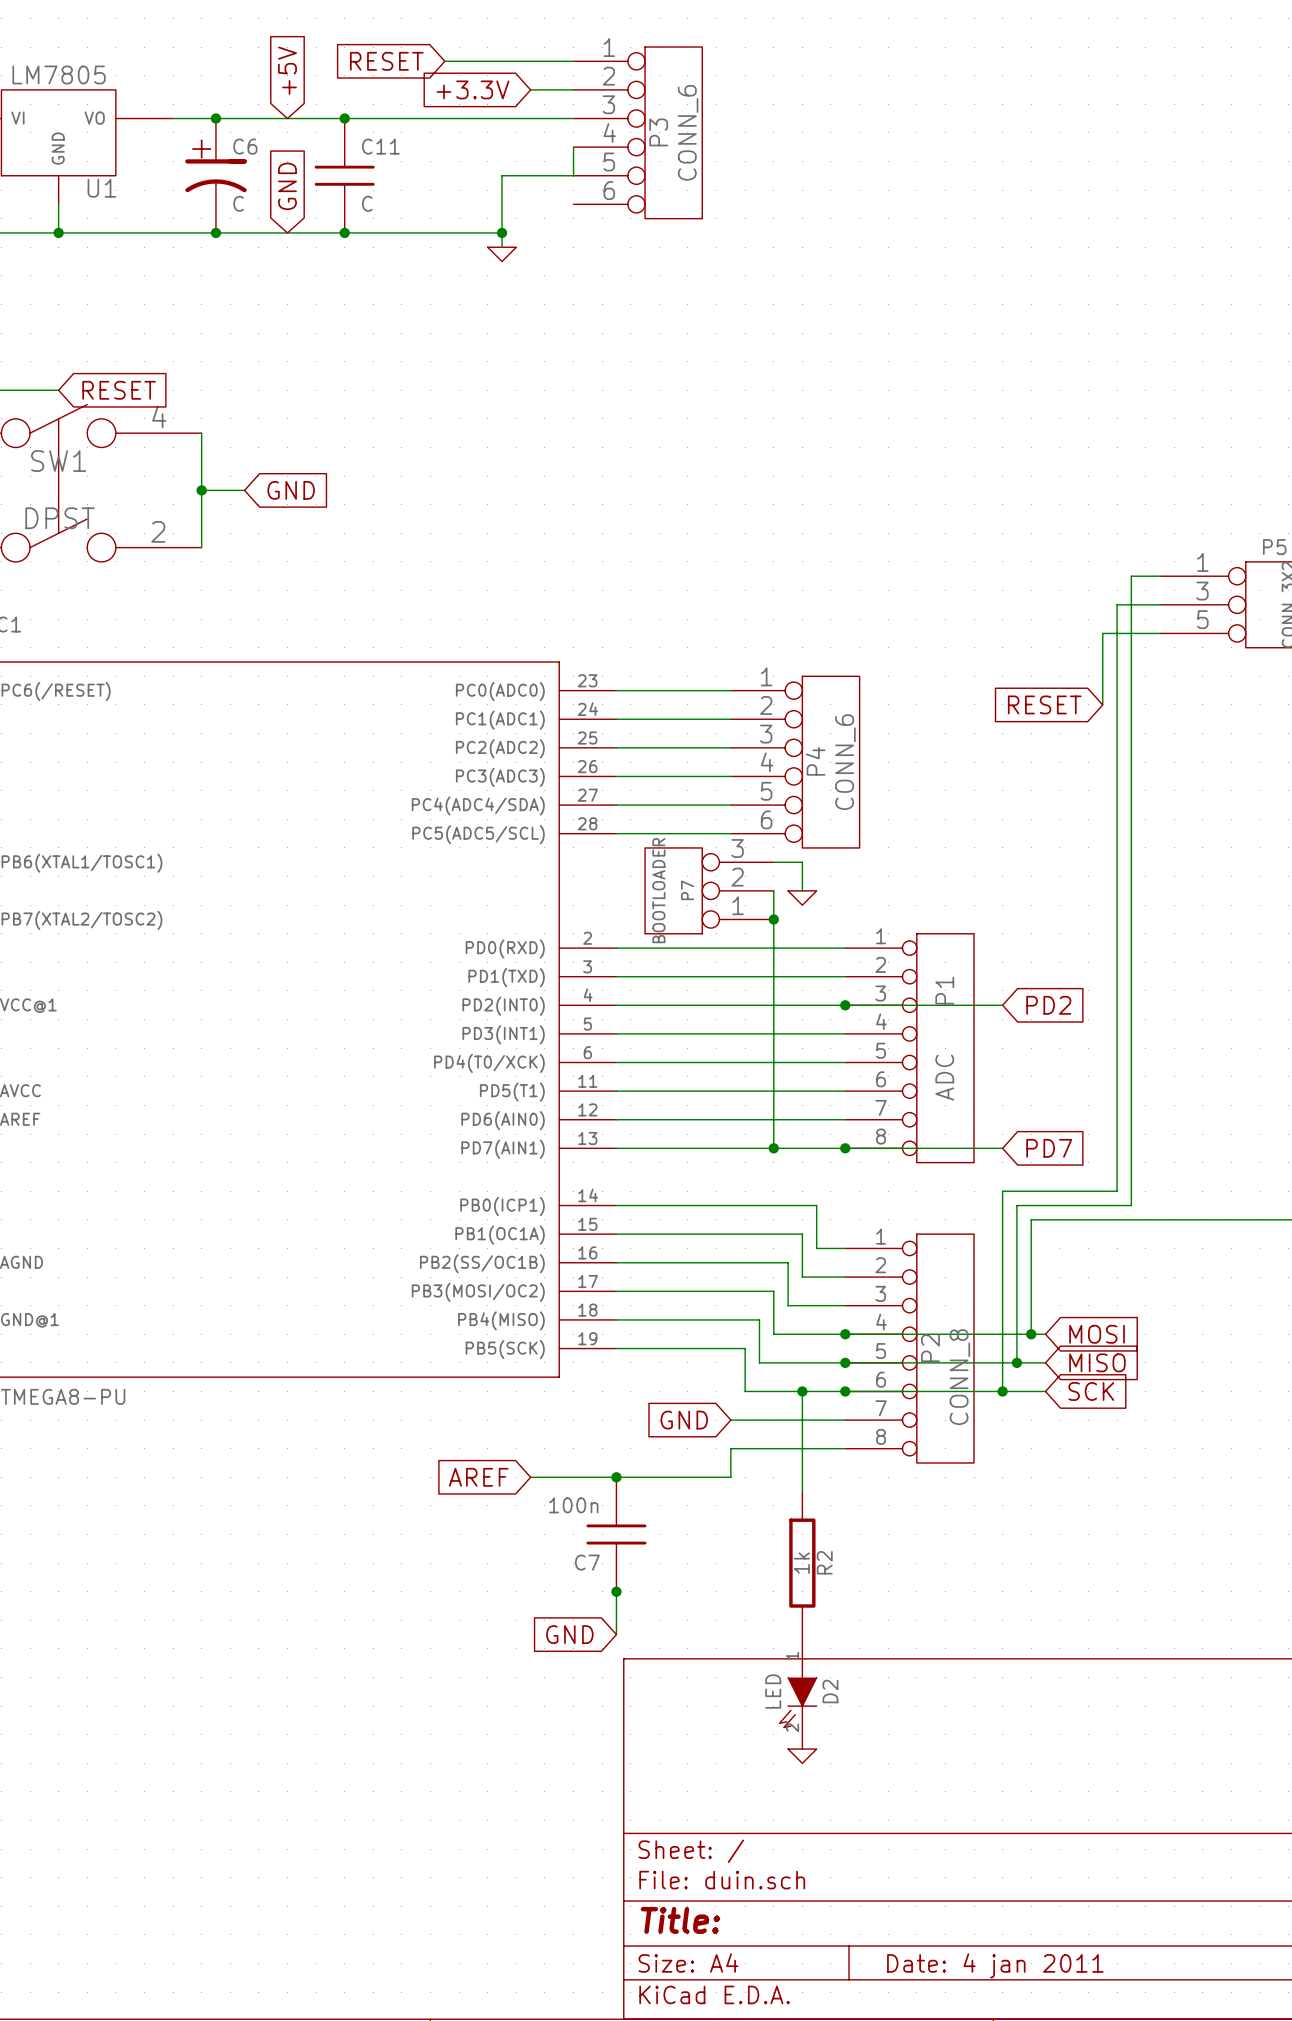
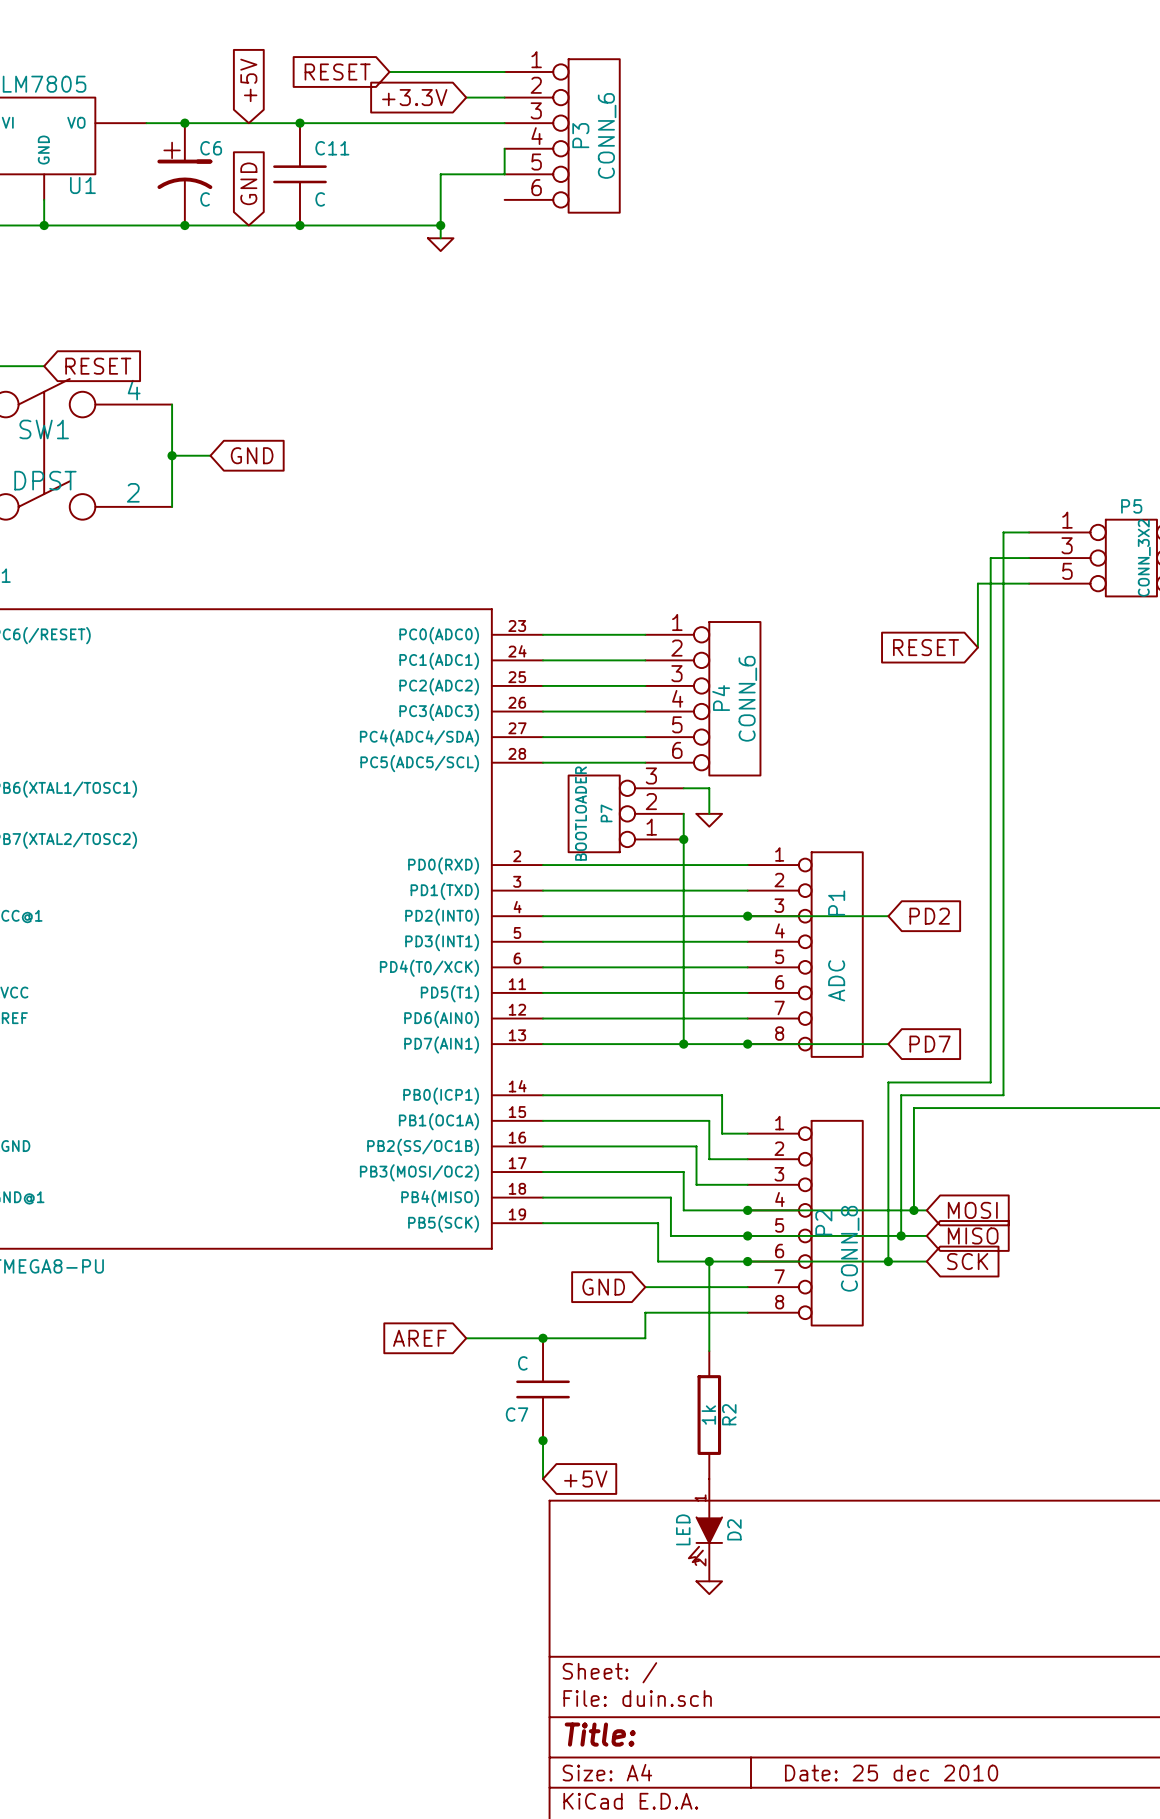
C7 value: 100n (573, 1505) -> C (522, 1363)
global label: GND (569, 1634) -> +5V (585, 1478)
title block: Date: 4 jan 2011 (995, 1965) -> Date: 25 dec 2010 (891, 1773)

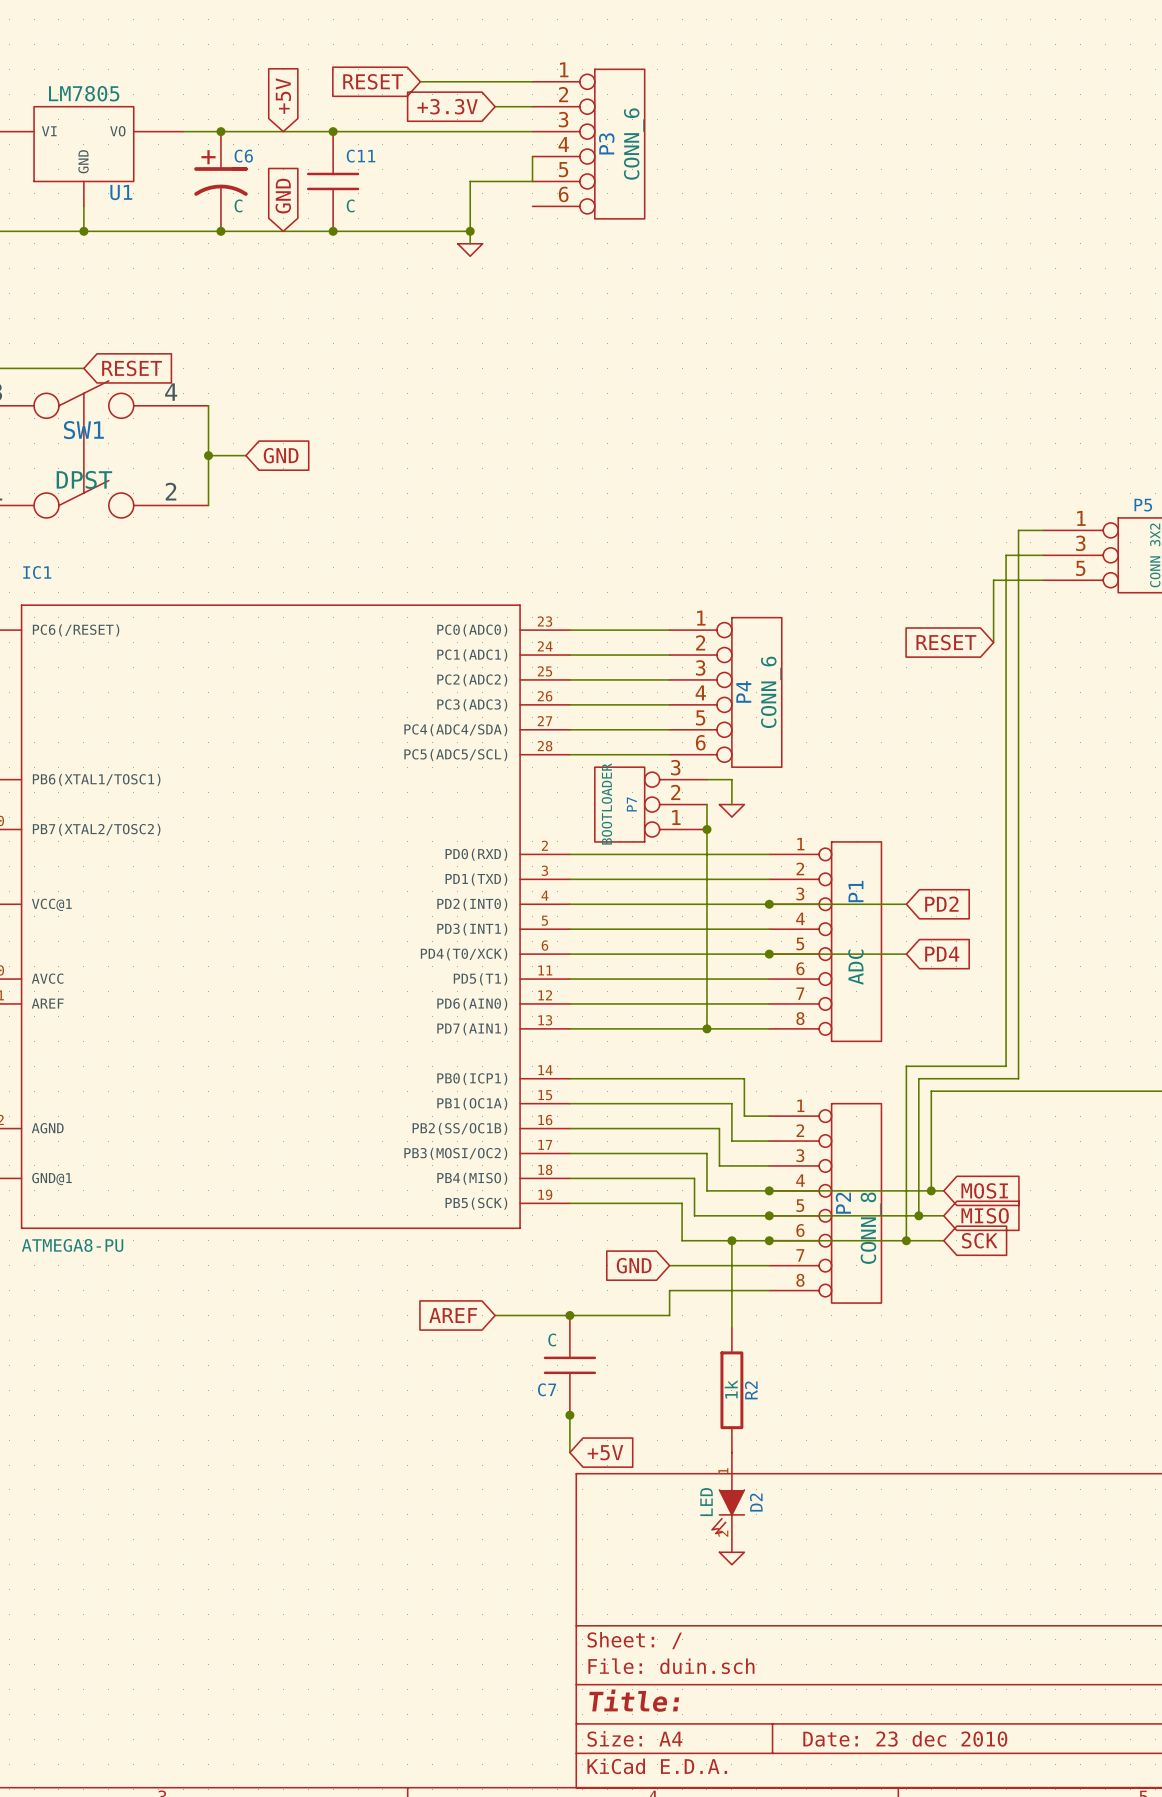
global label: none -> PD4 (942, 954)
junction: none -> (769, 954)
wire: (747, 1044) (888, 1044) -> (769, 954) (906, 954)
junction: (747, 1044) -> none
global label: PD7 (930, 1044) -> none
title block: Date: 25 dec 2010 (891, 1773) -> Date: 23 dec 2010 (905, 1738)

